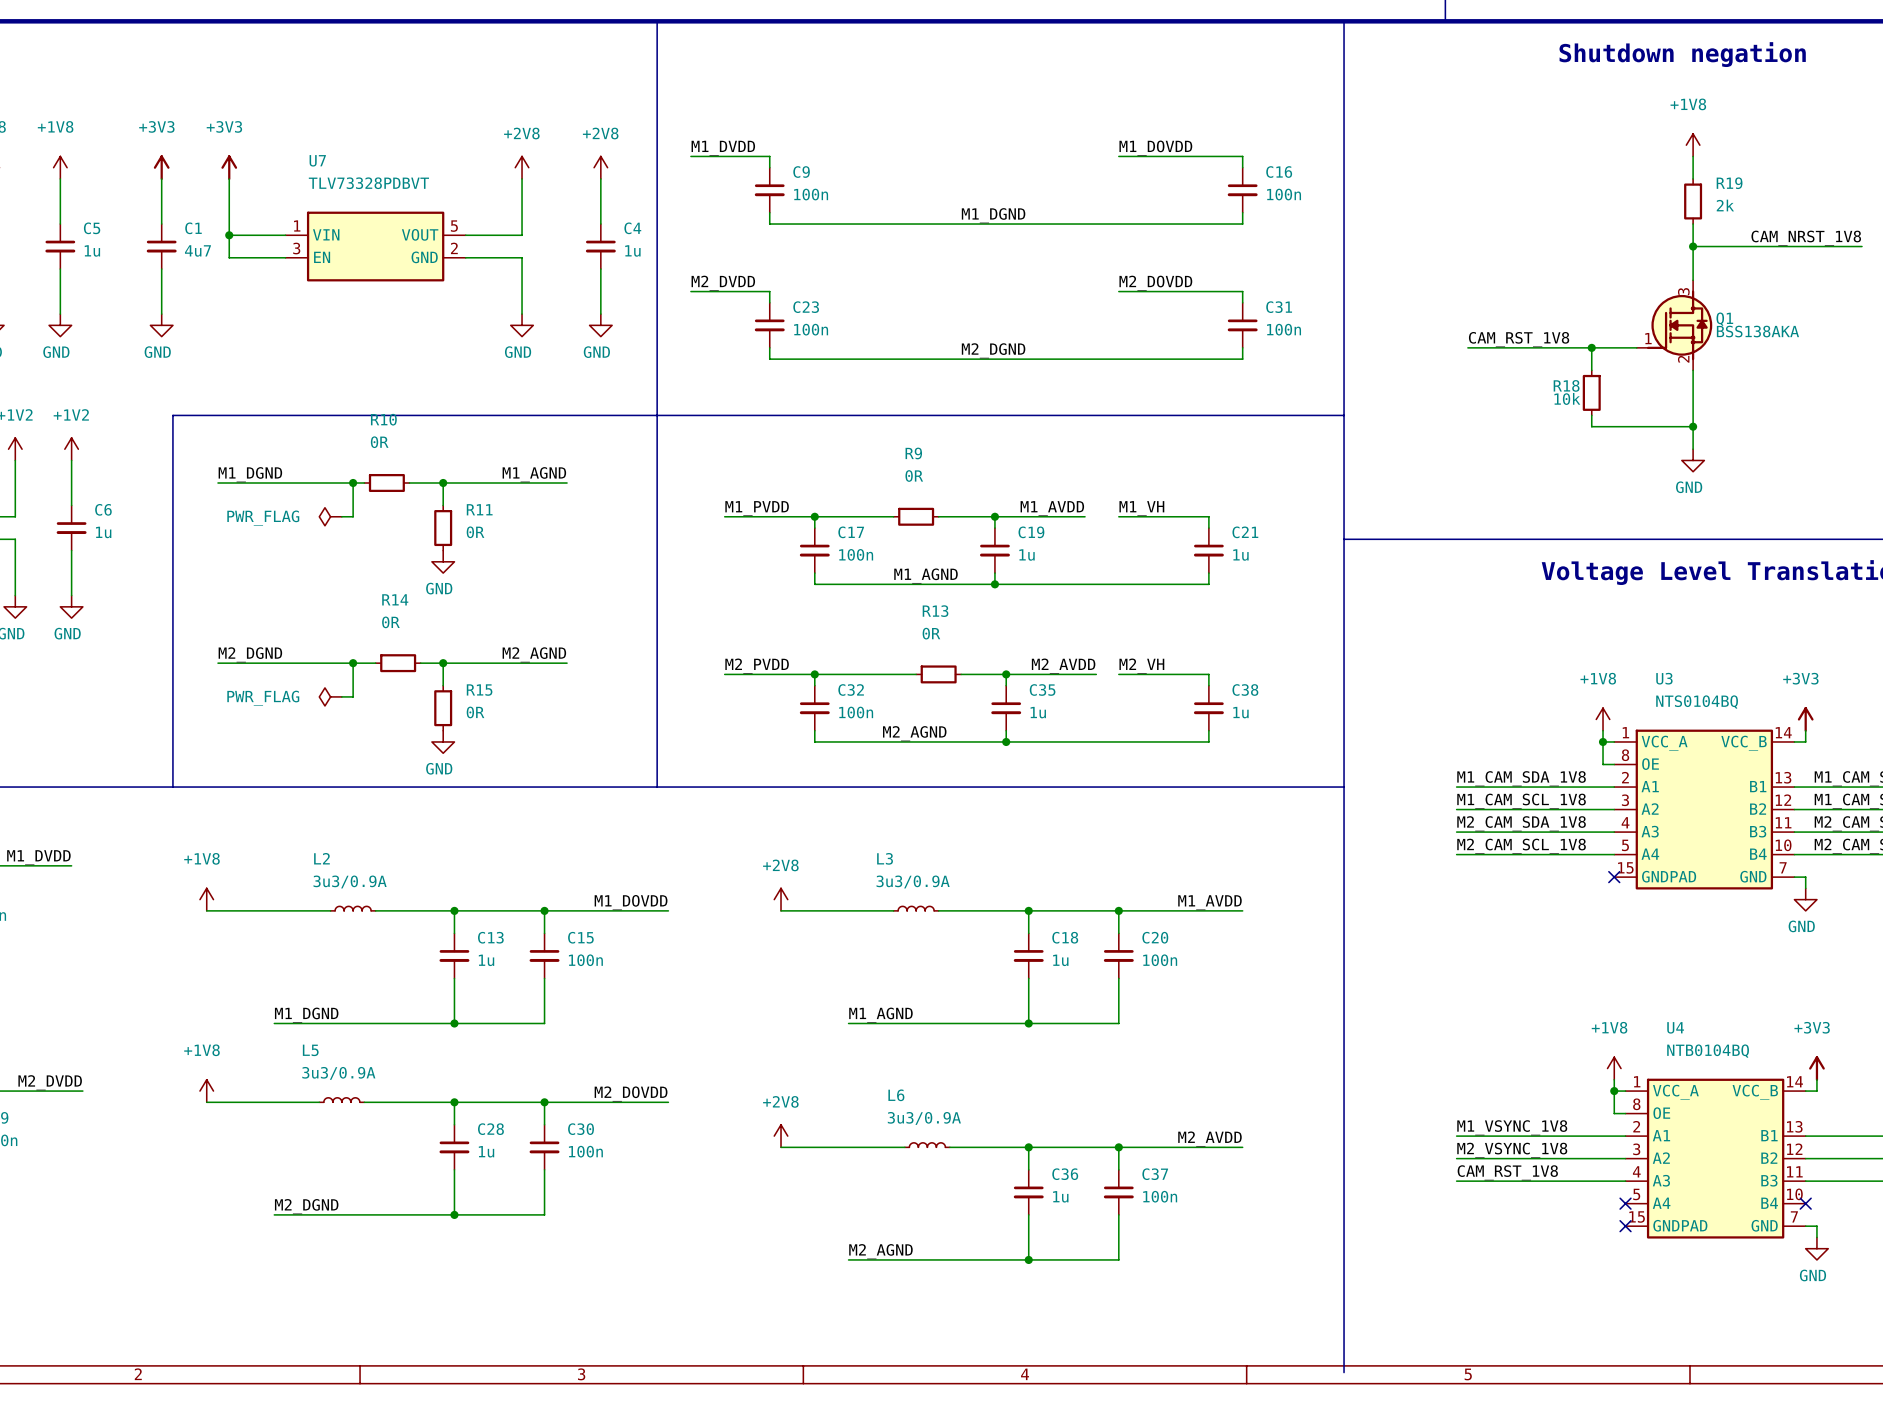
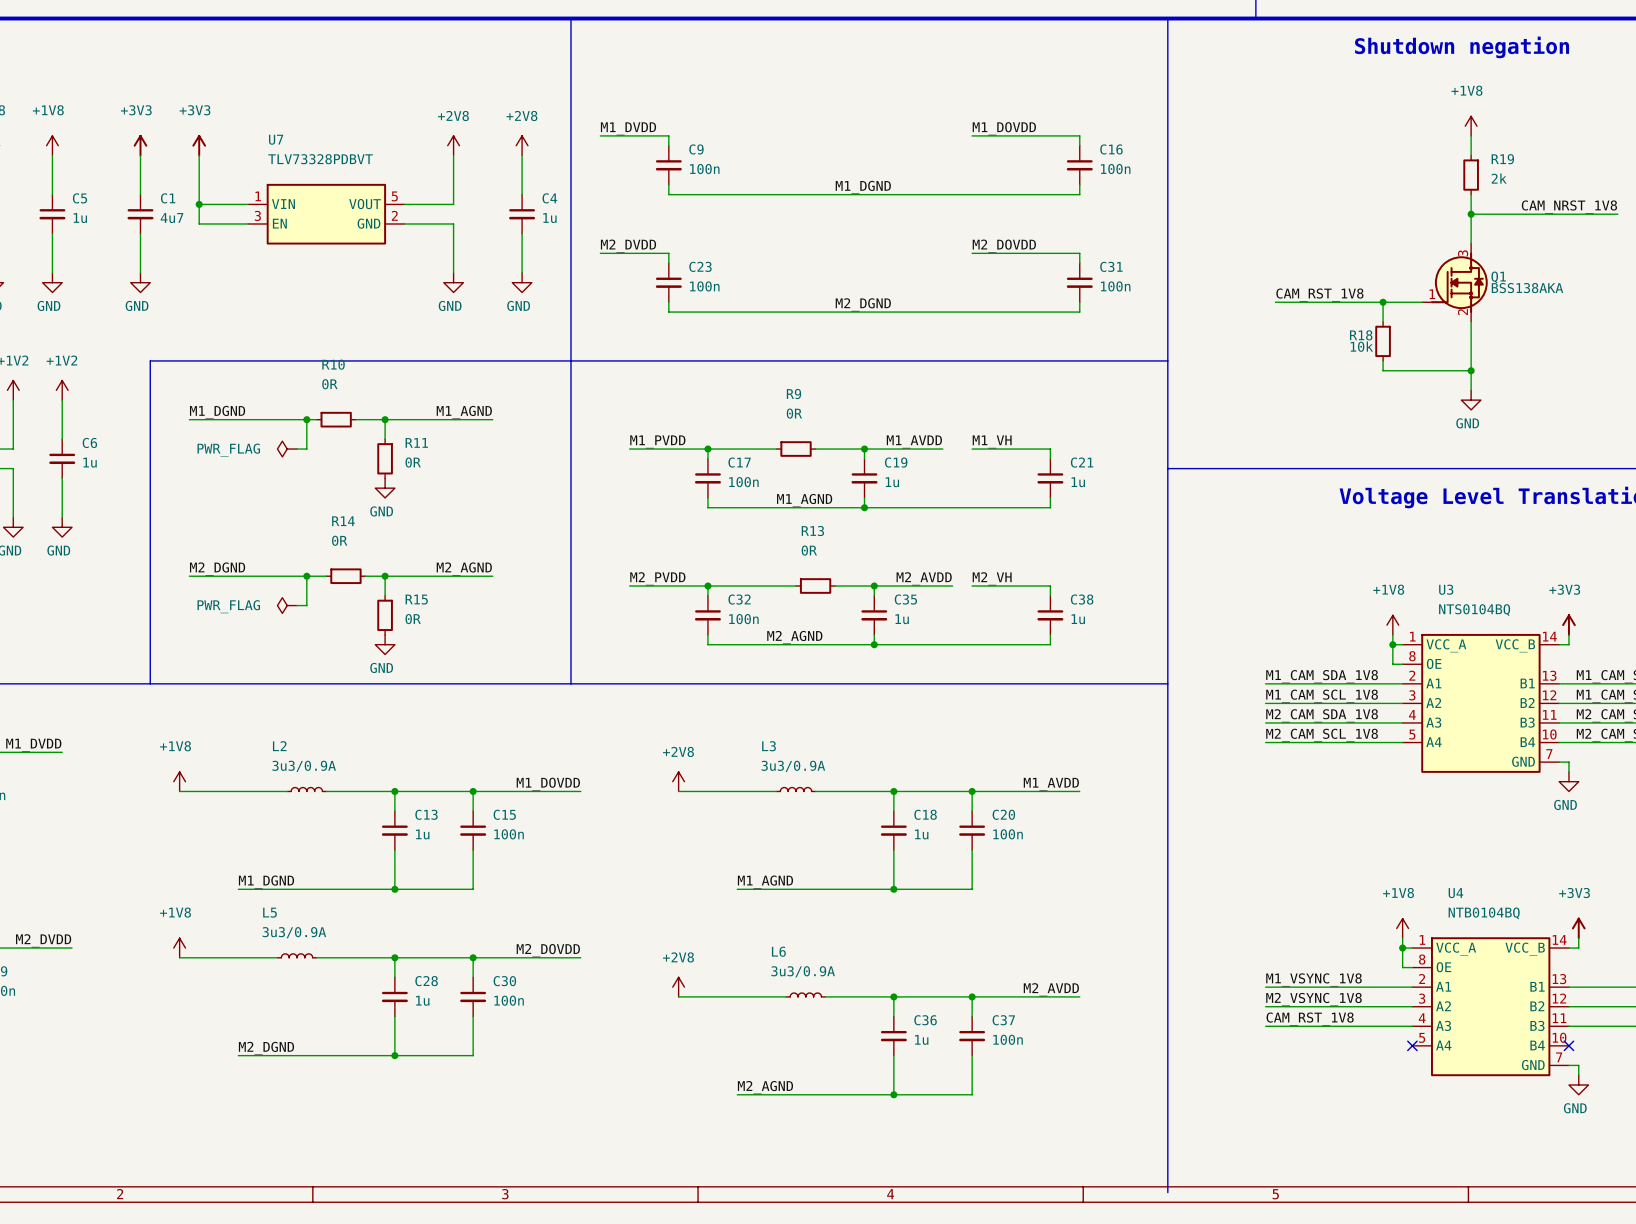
U3 symbol: [1614, 729, 1795, 890] -> [1402, 633, 1560, 773]
no-connect mark: (1614, 877) -> none
U4 symbol: [1625, 1078, 1806, 1239] -> [1412, 937, 1569, 1077]
no-connect mark: (1625, 1226) -> none

